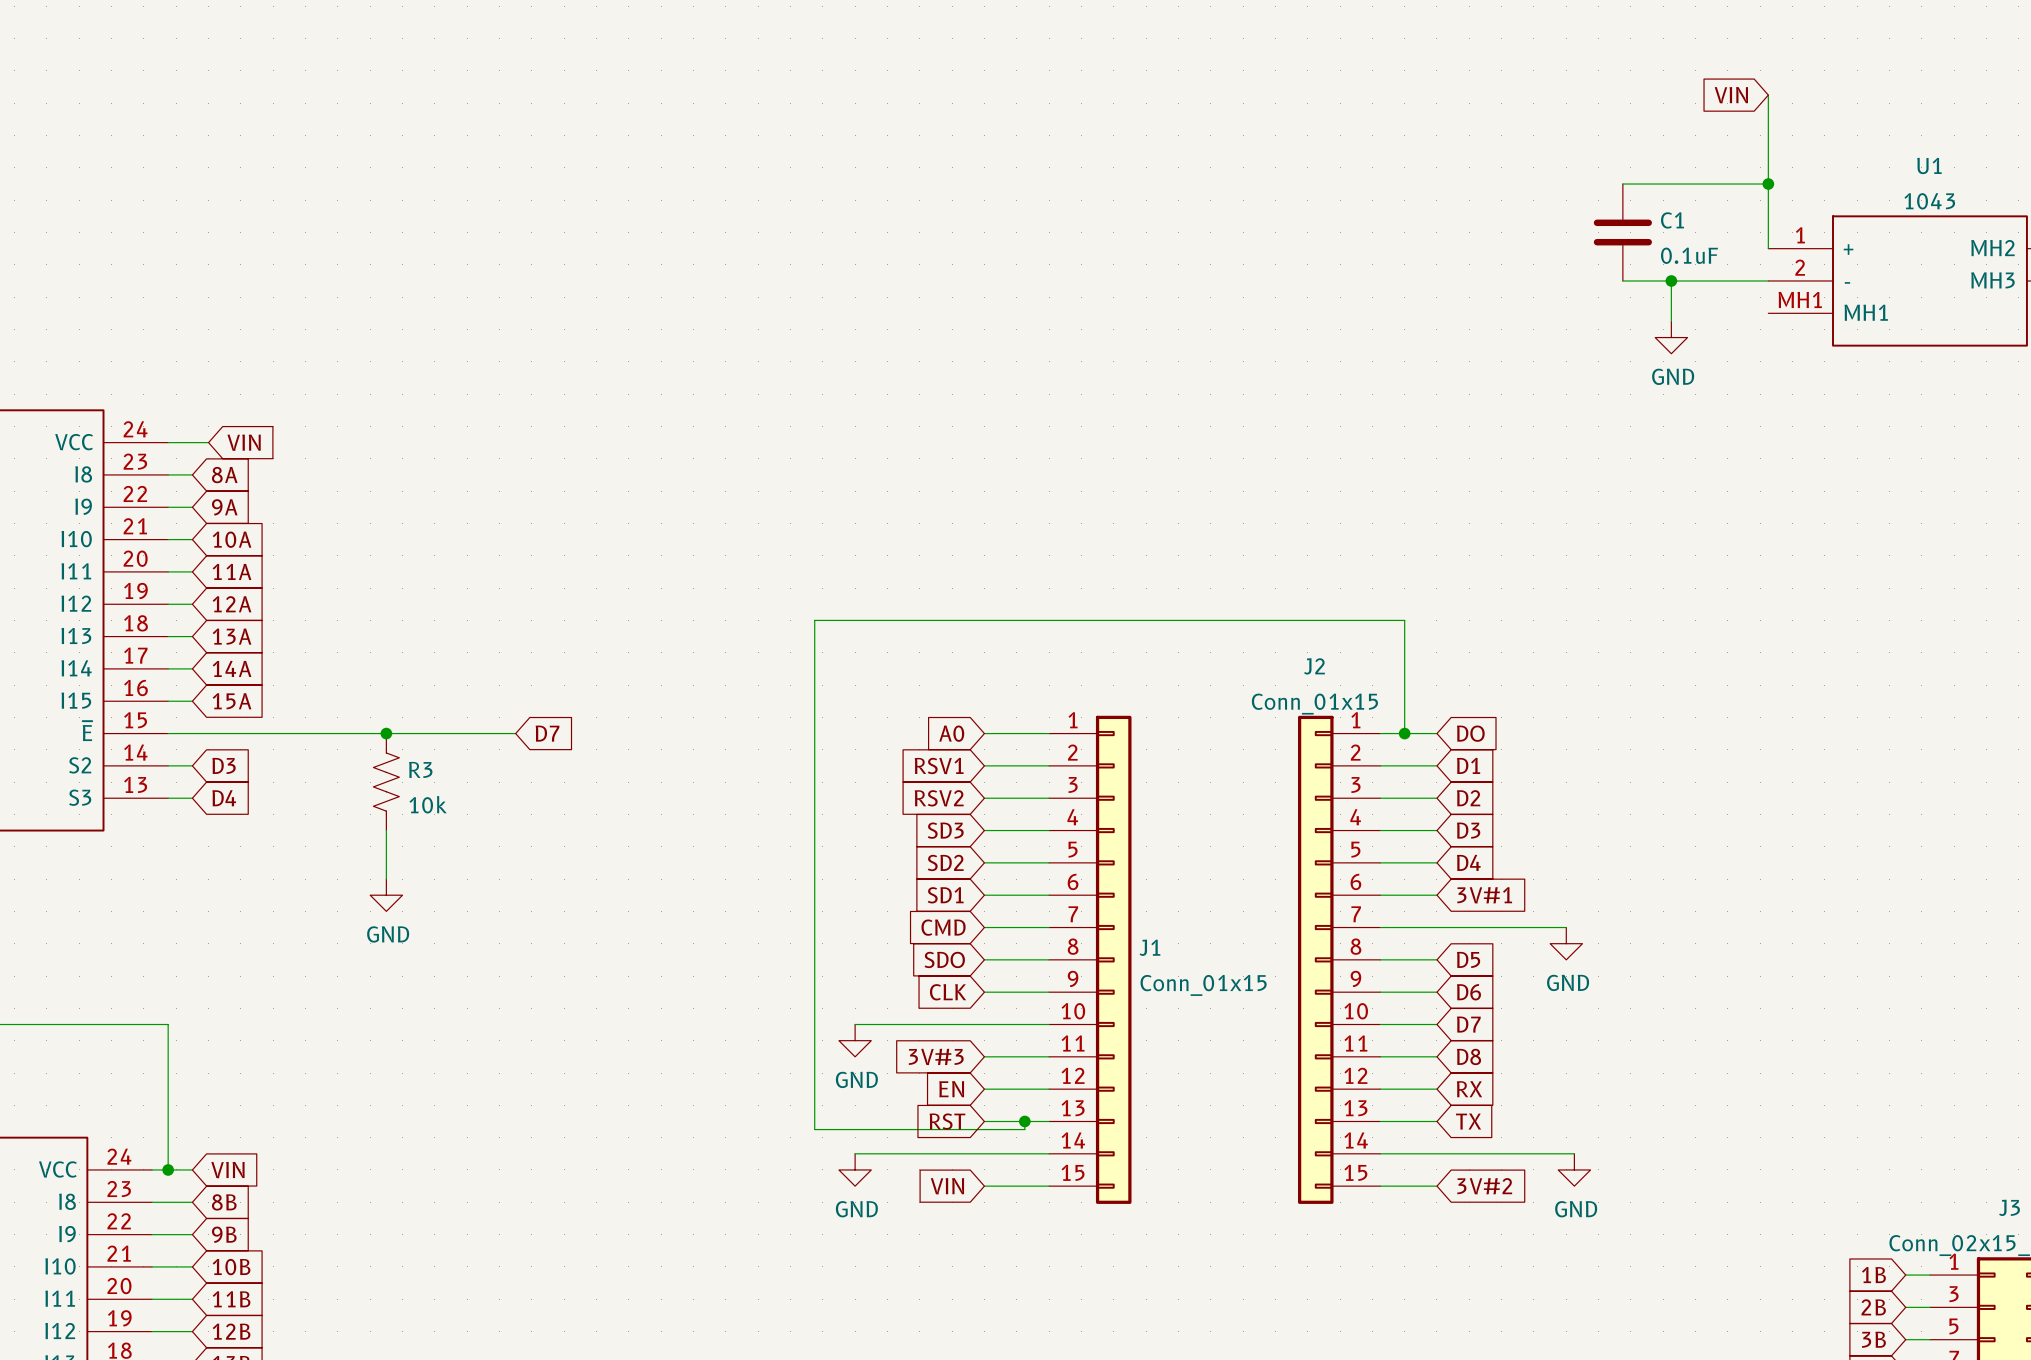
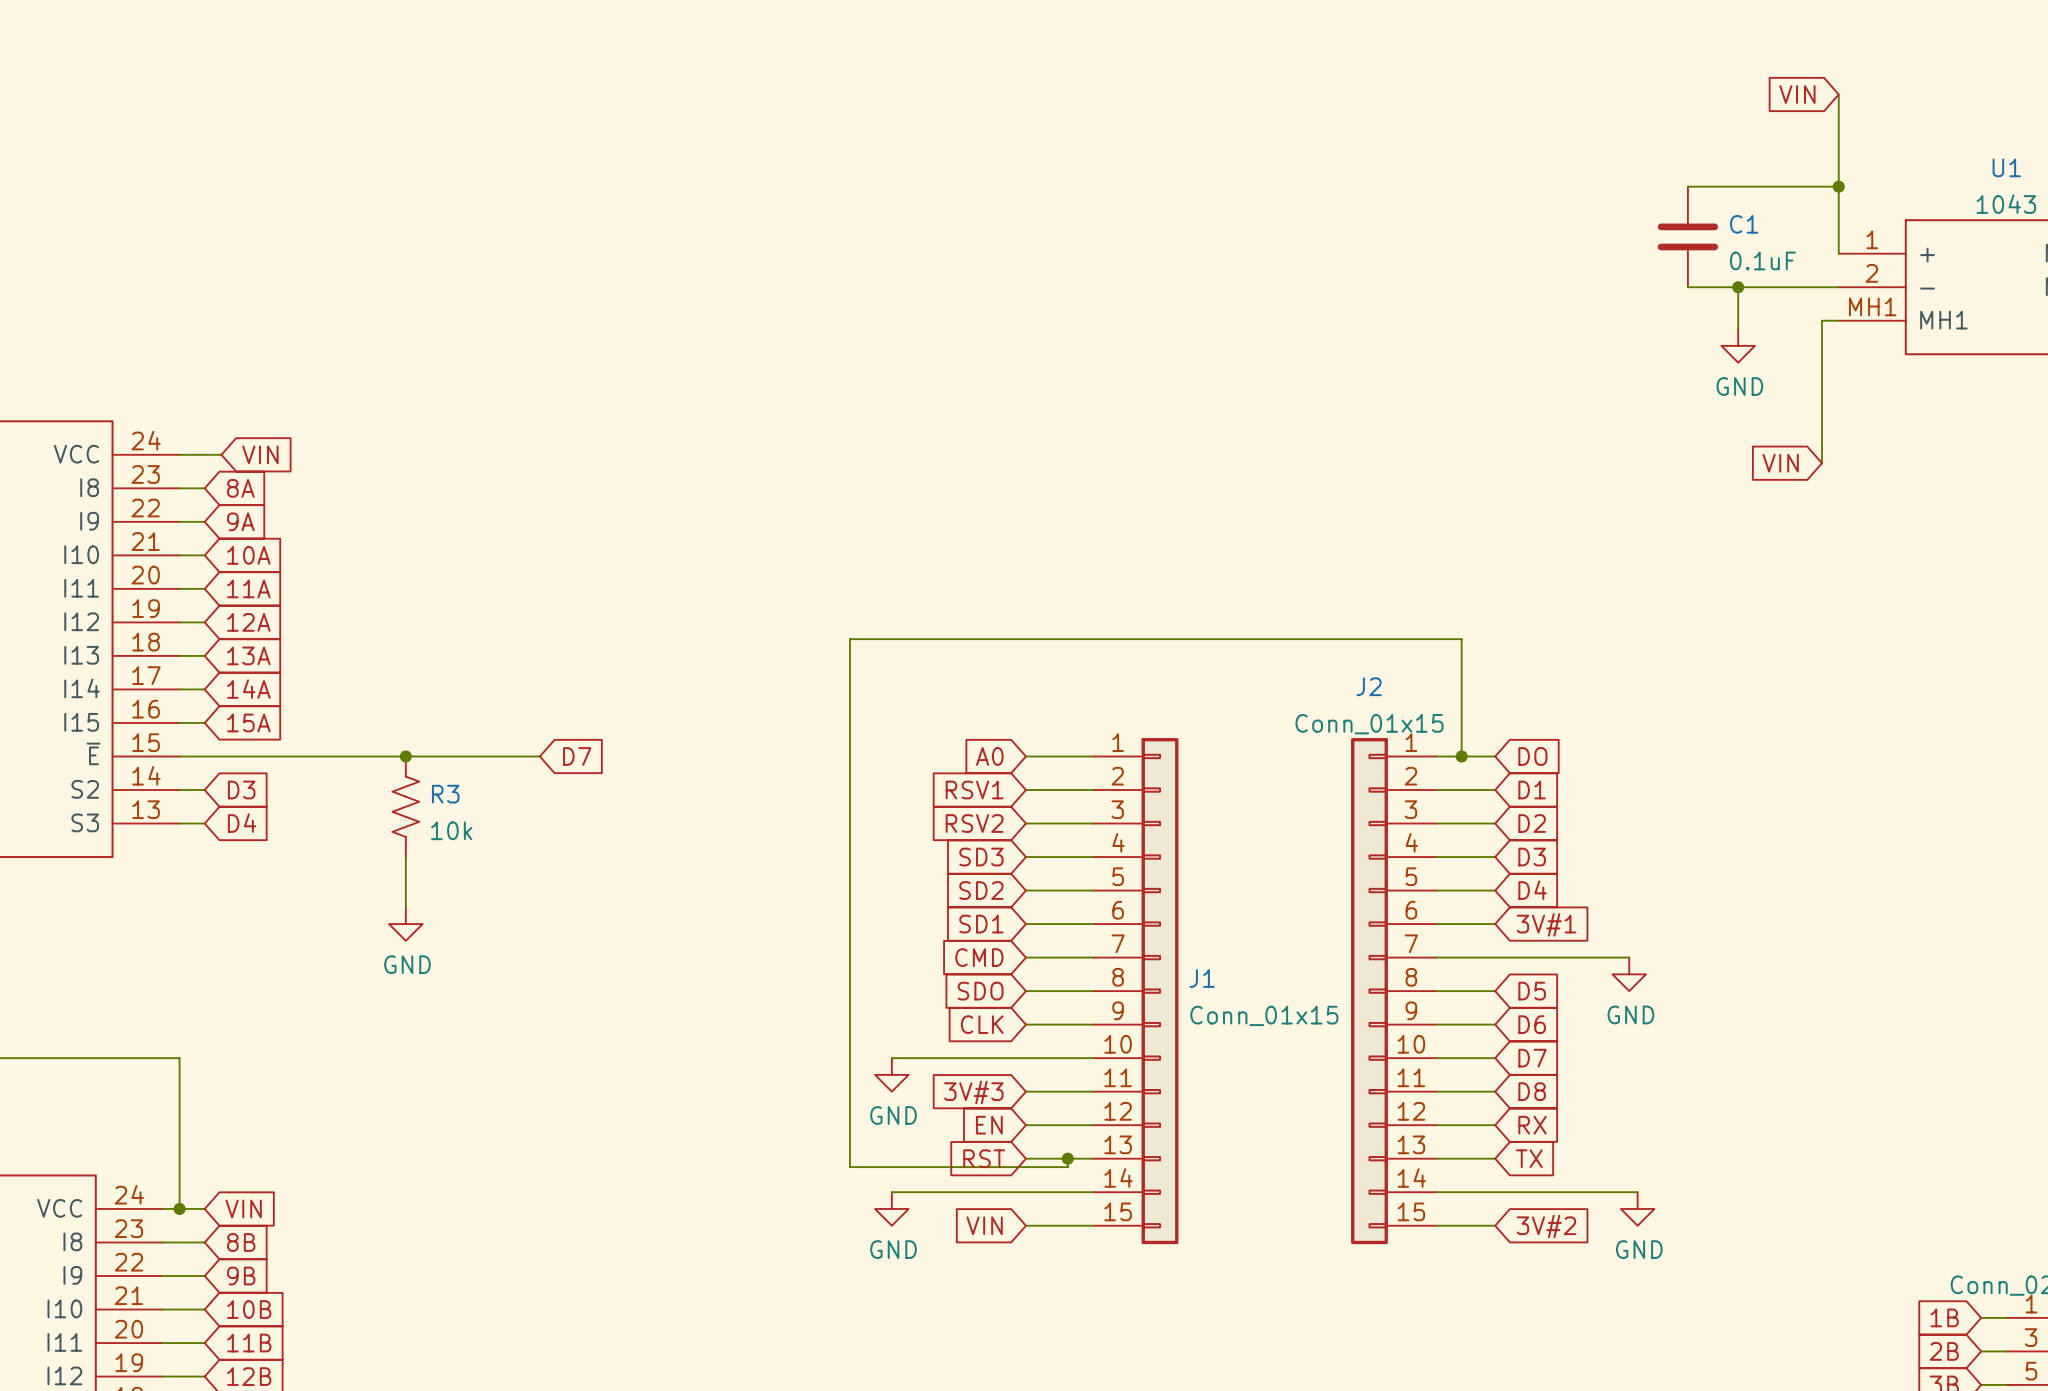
wire: none -> (1838, 320) (1821, 320) (1821, 463)
global label: none -> VIN (1780, 463)

